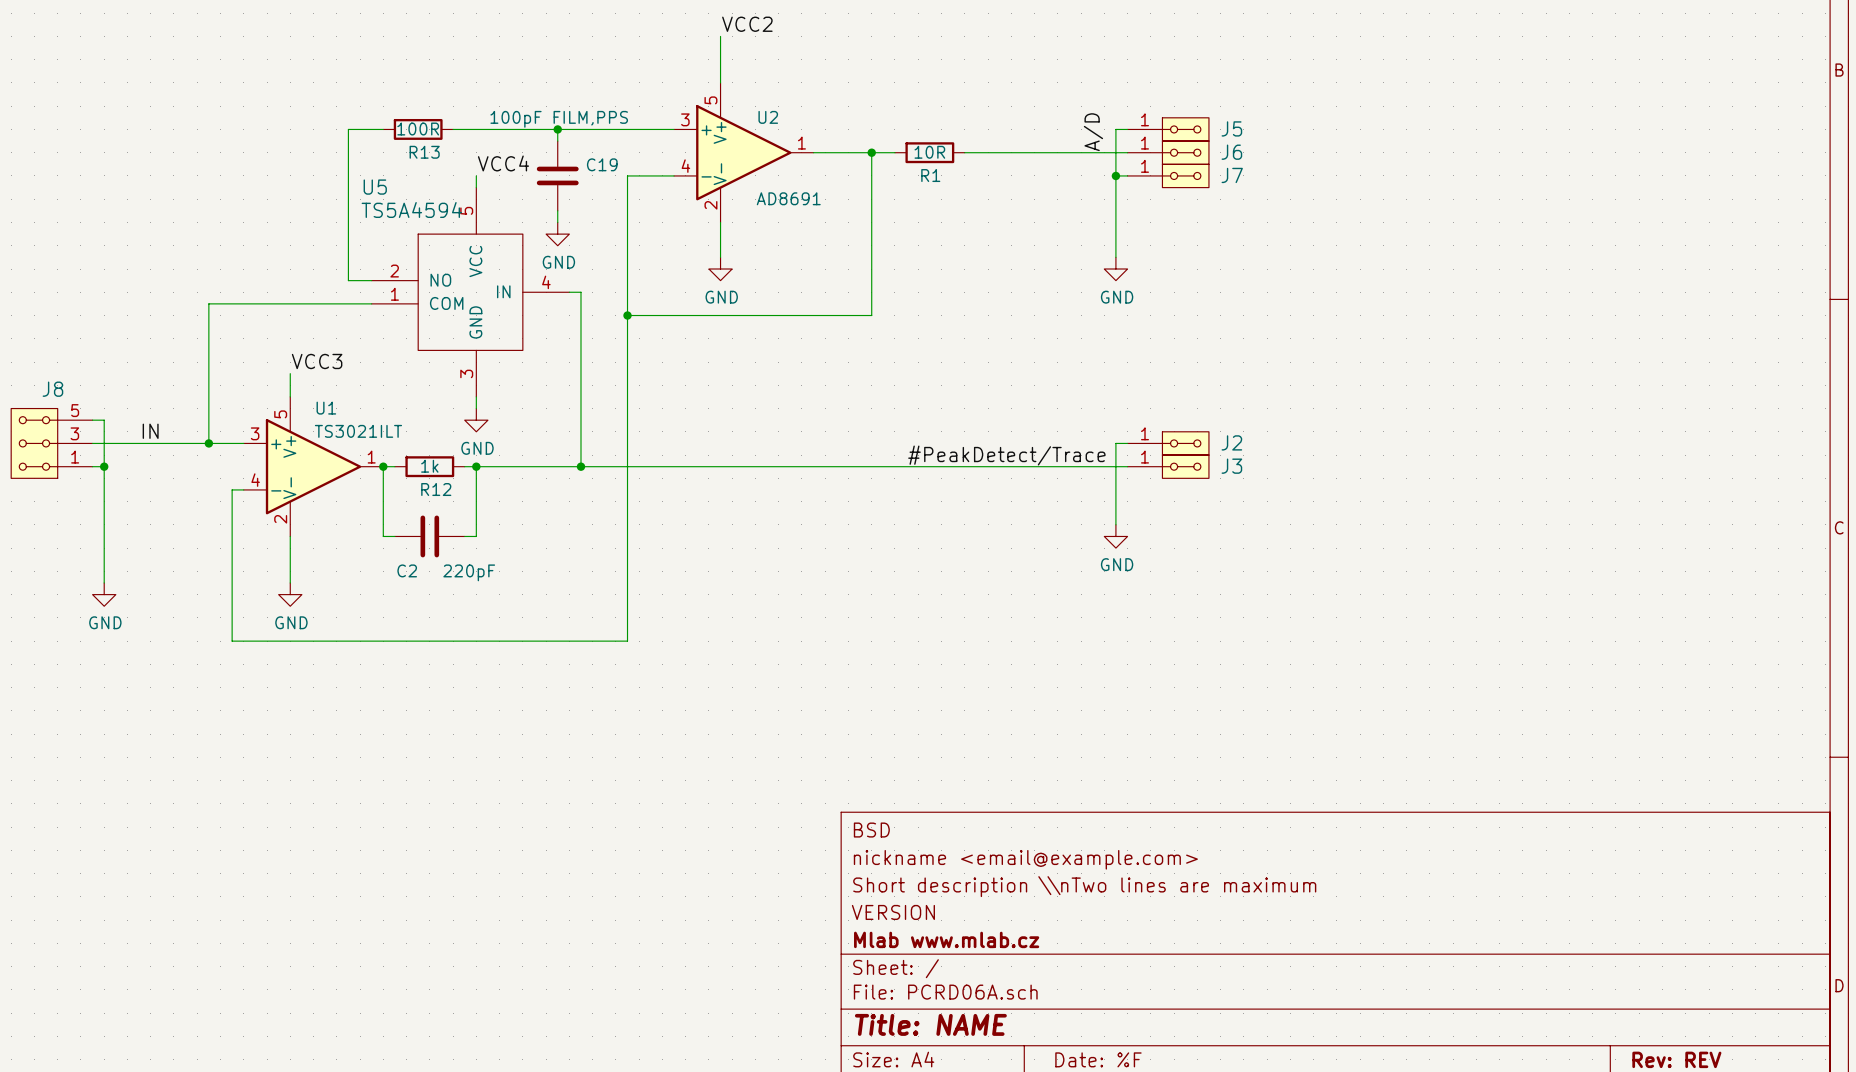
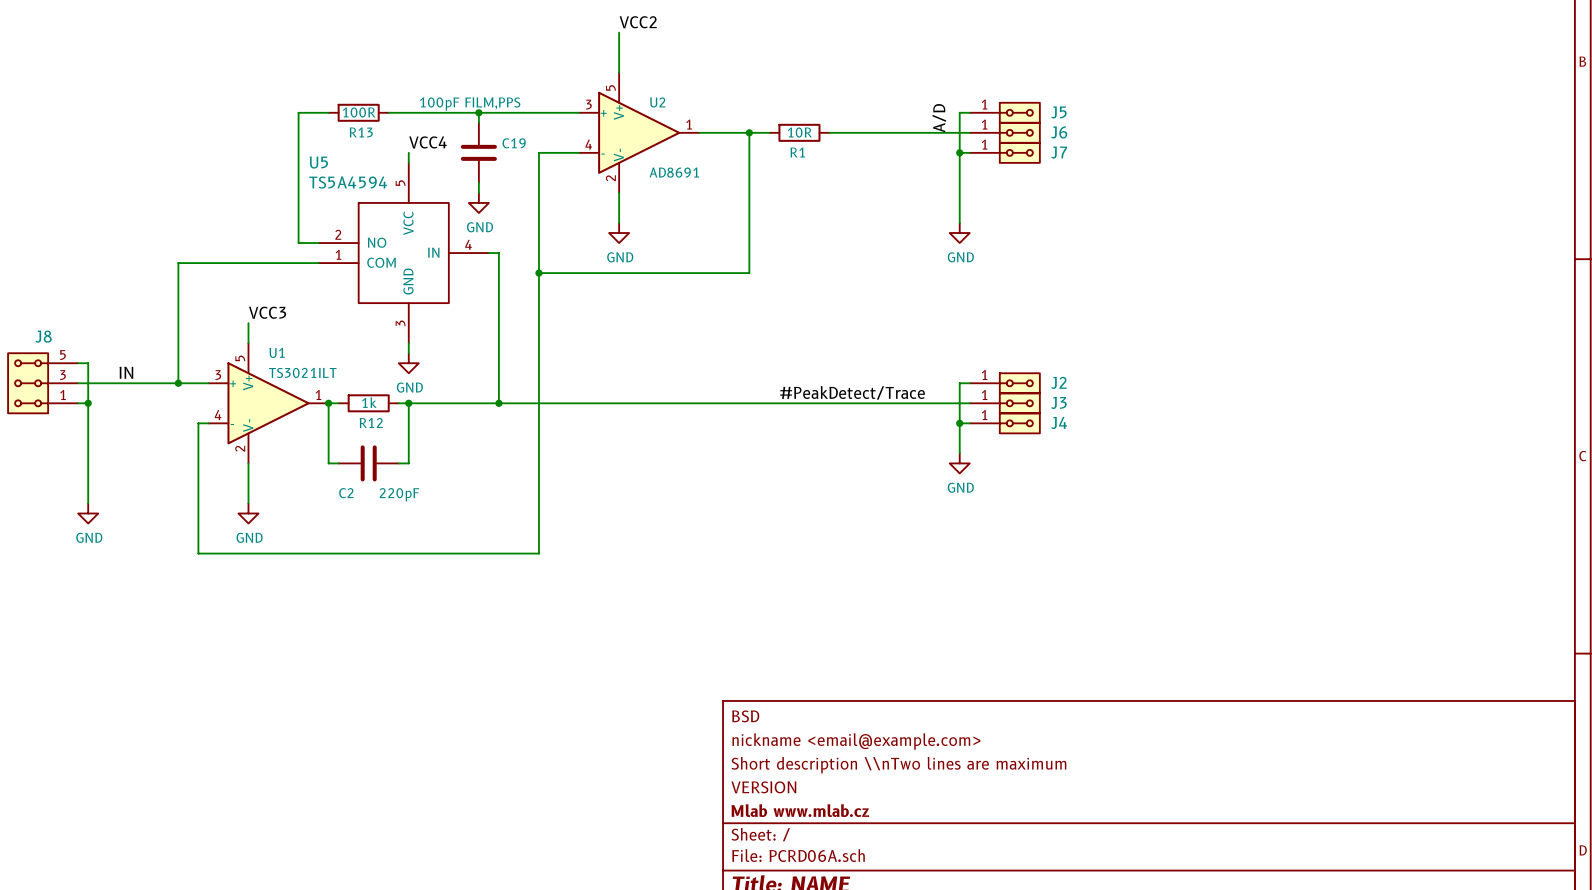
wire: none -> (959, 423) (969, 423)
junction: none -> (959, 423)
J4: none -> (1004, 423)

